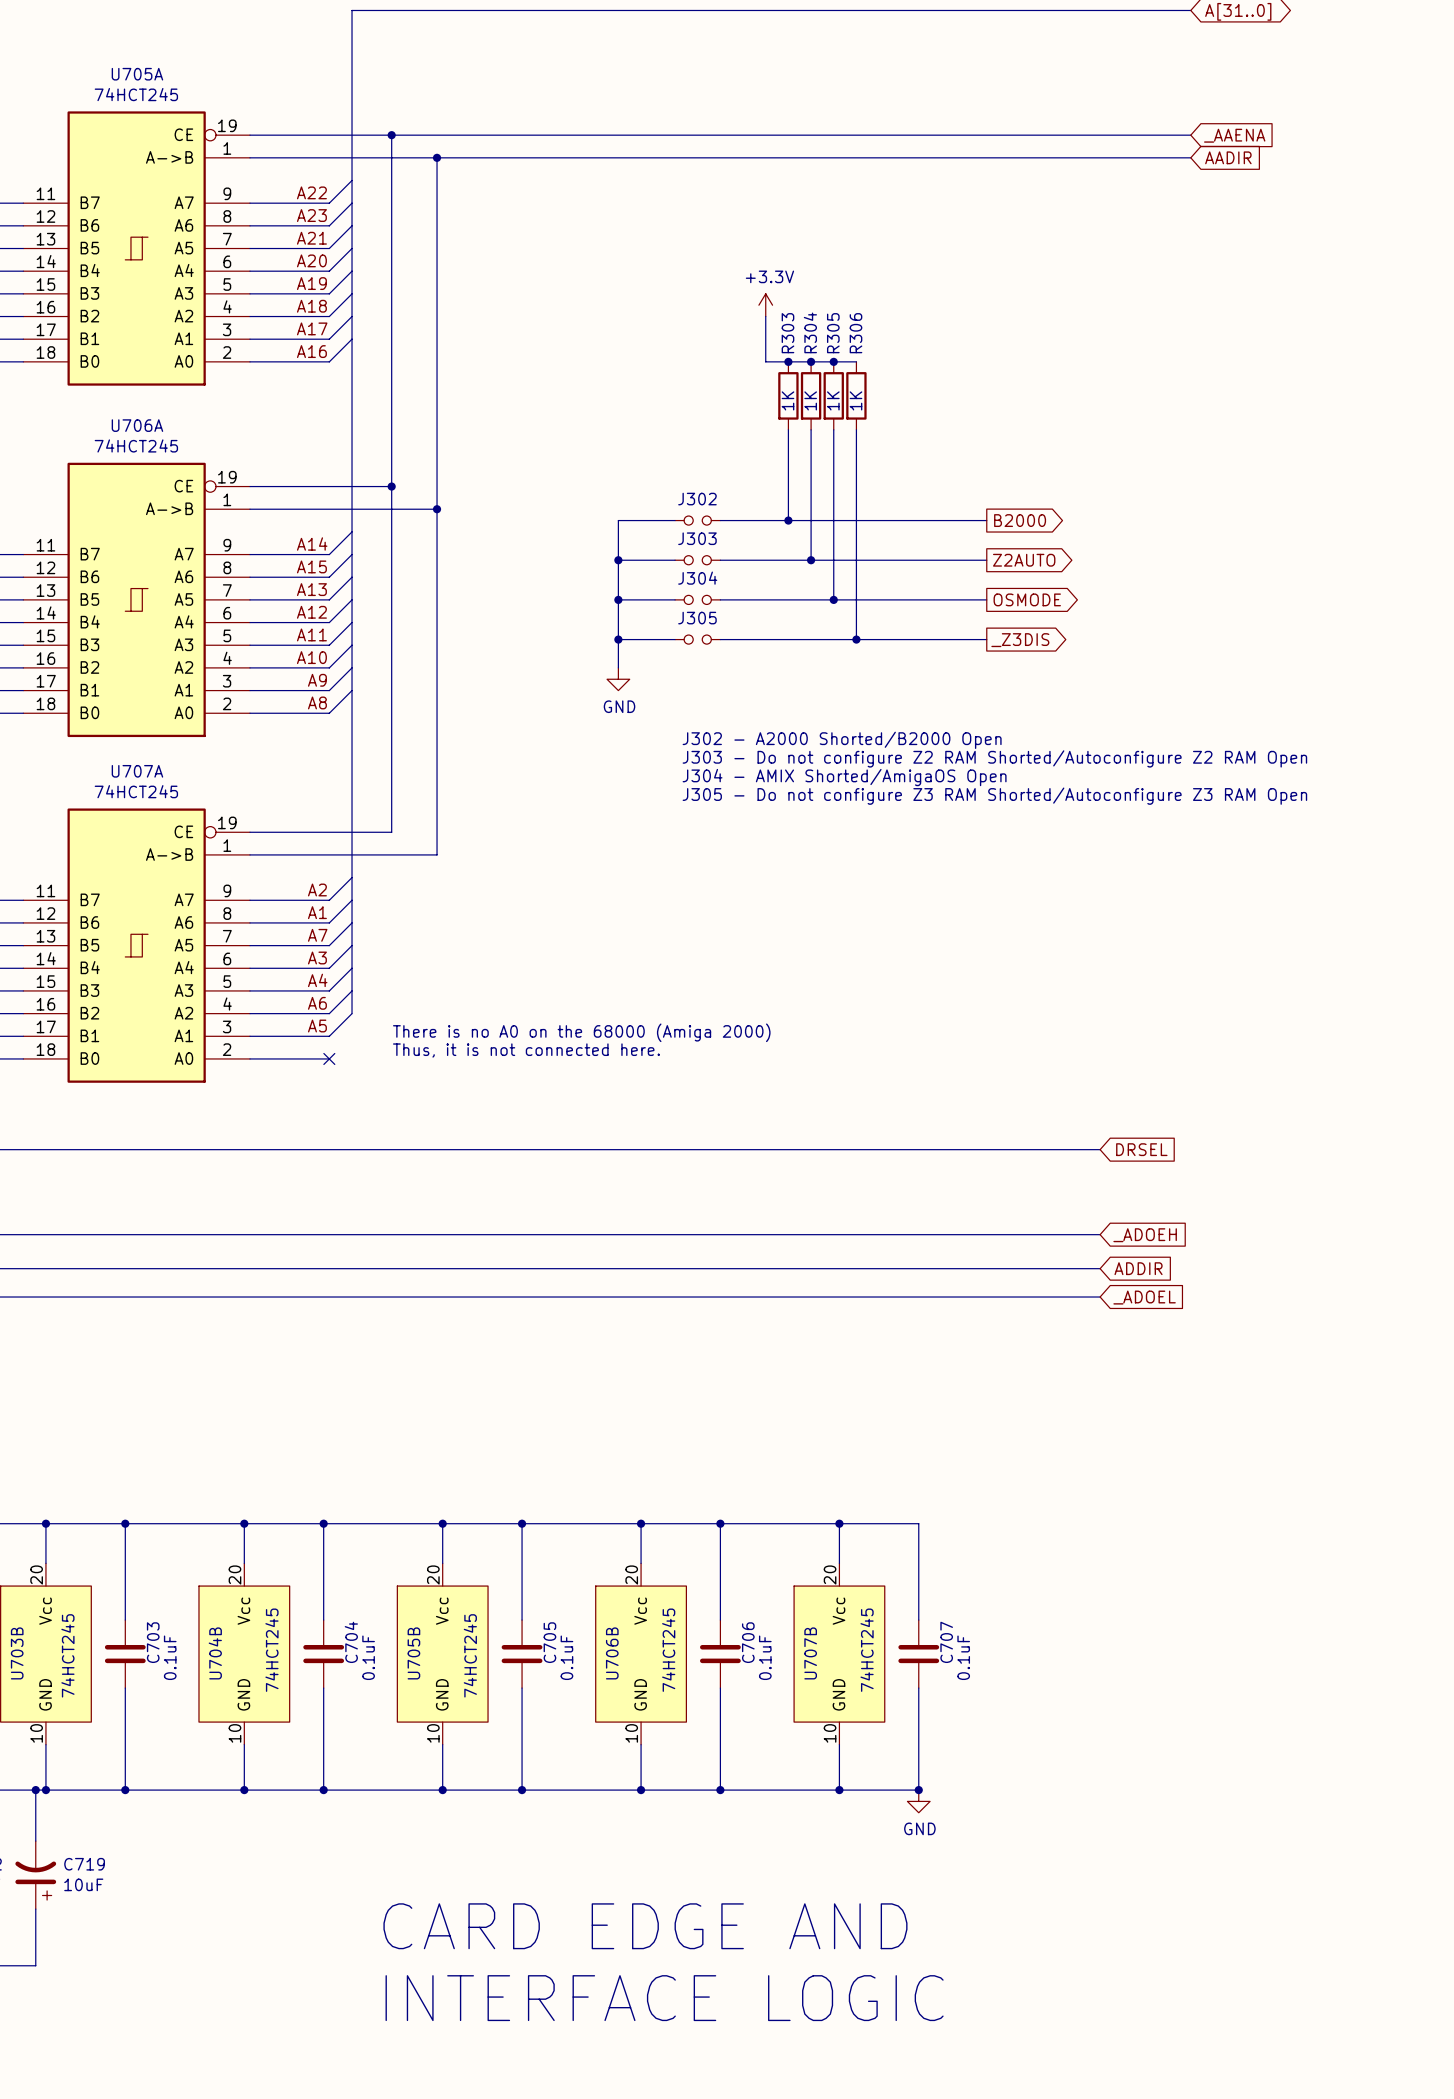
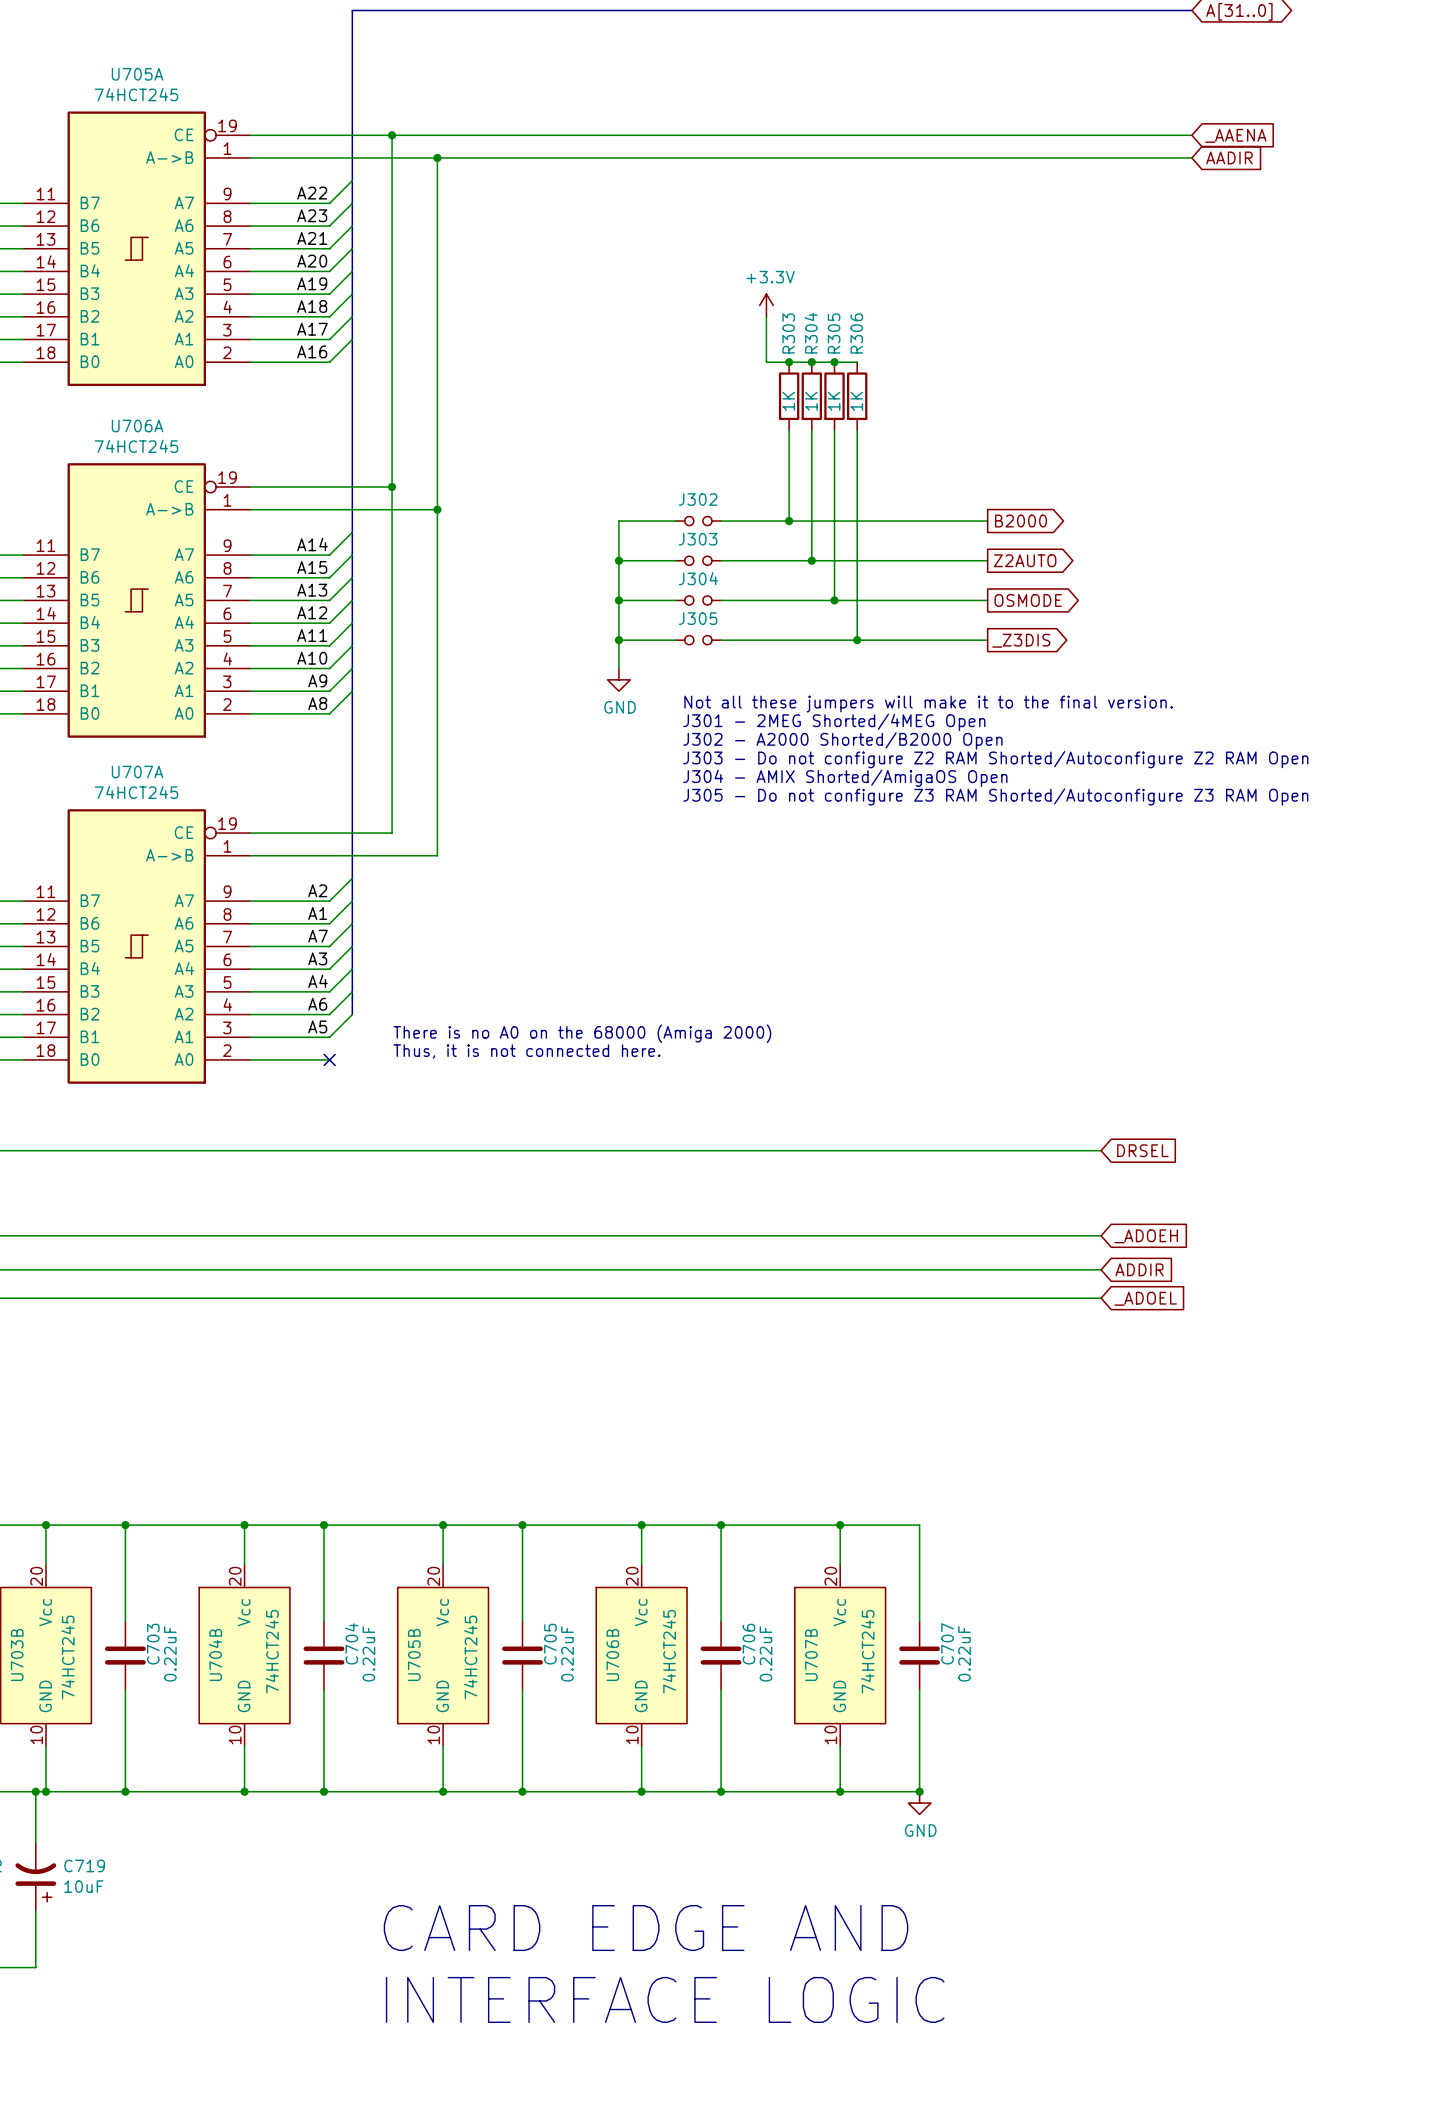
text: none -> Not all these jumpers will make it to the final version. (928, 704)
text: none -> J301 - 2MEG Shorted/4MEG Open (834, 722)
C703 value: 0.1uF (170, 1657) -> 0.22uF (170, 1653)
C704 value: 0.1uF (368, 1657) -> 0.22uF (368, 1653)
C705 value: 0.1uF (566, 1657) -> 0.22uF (567, 1653)
C706 value: 0.1uF (765, 1657) -> 0.22uF (766, 1653)
C707 value: 0.1uF (963, 1657) -> 0.22uF (964, 1653)

